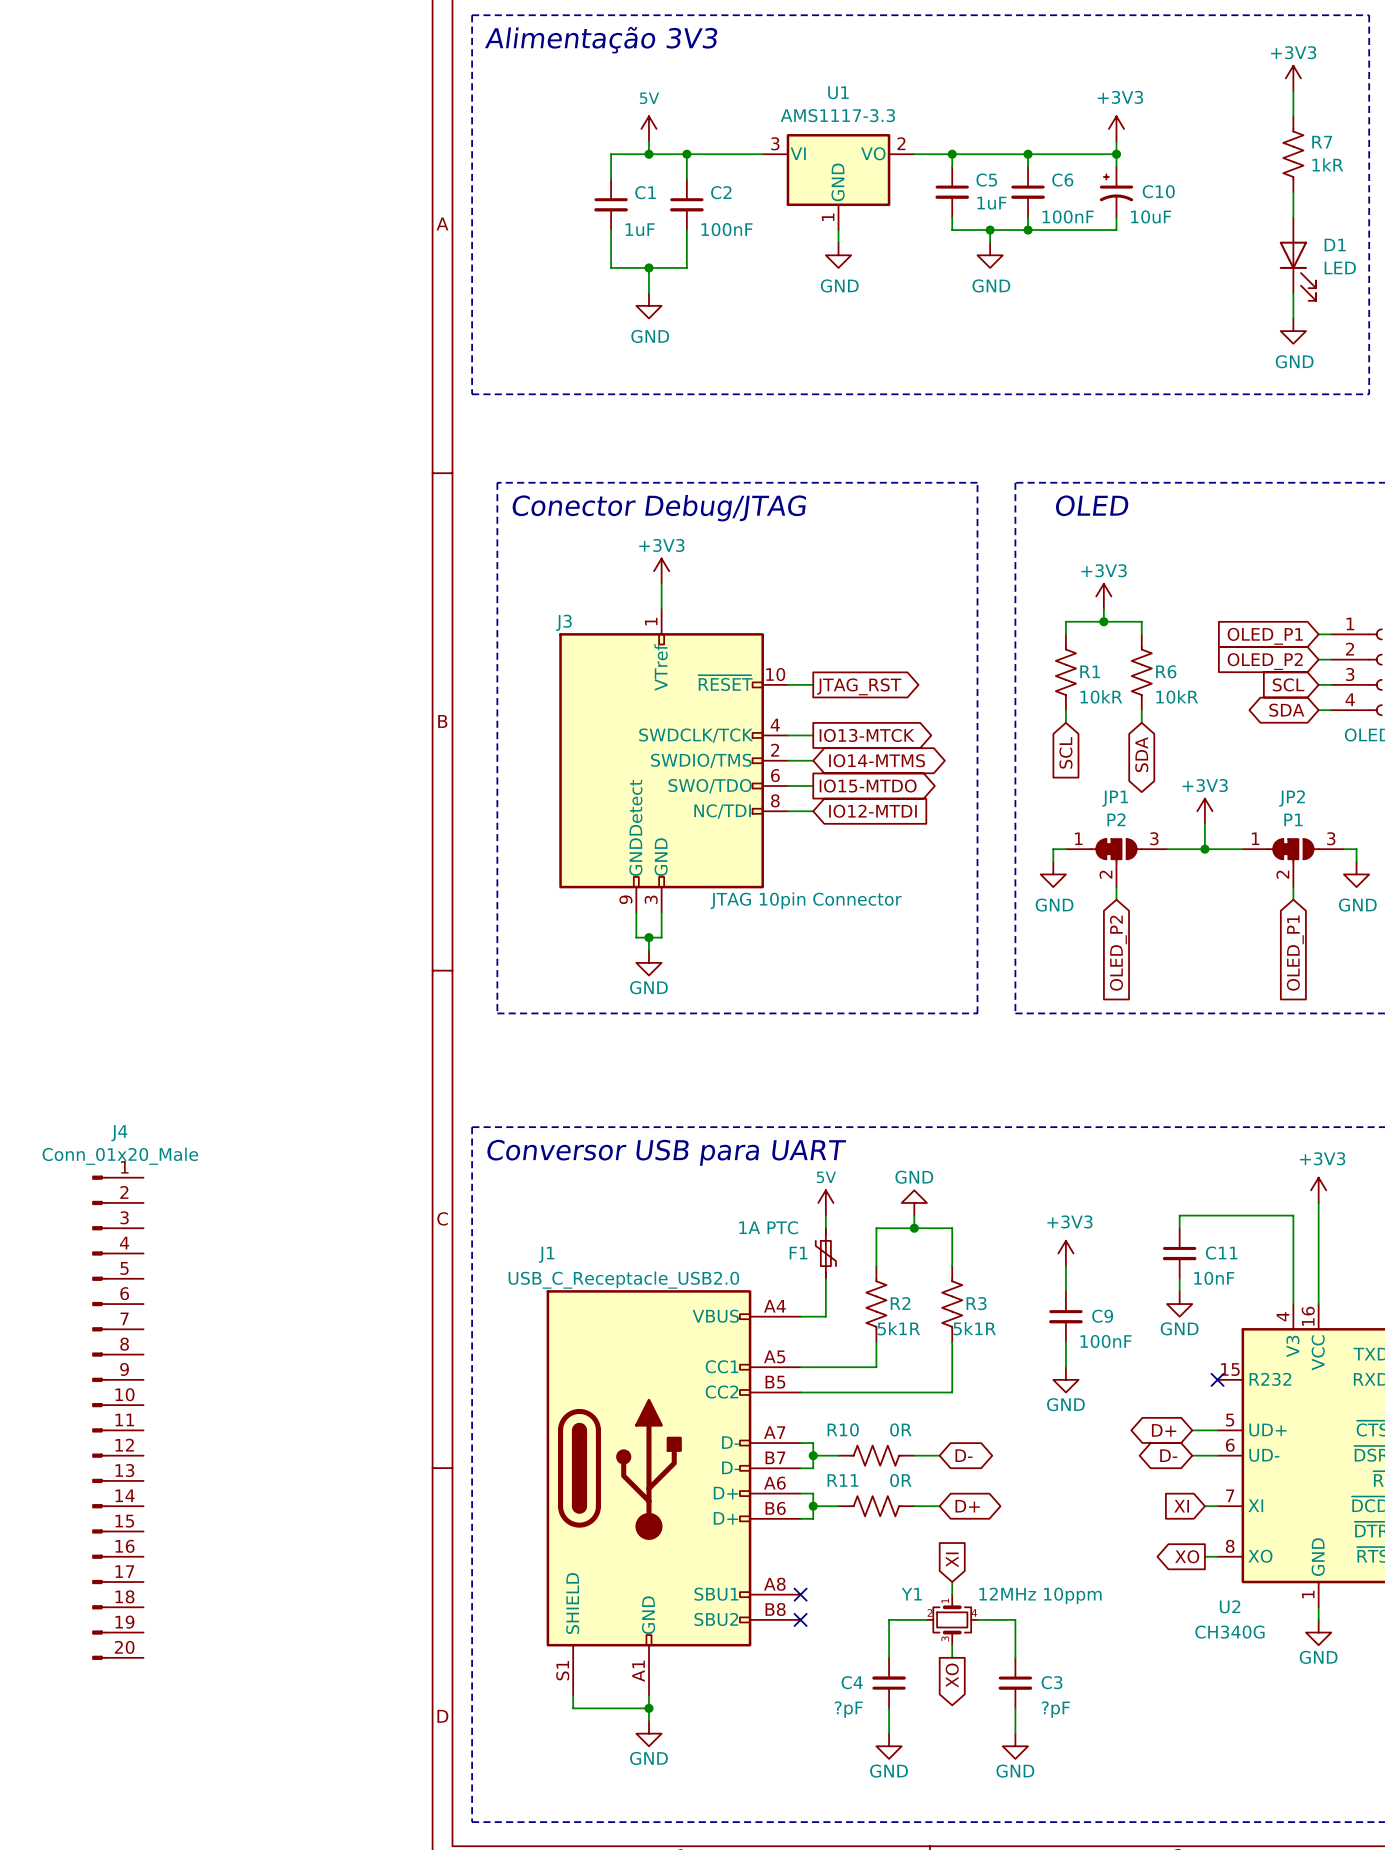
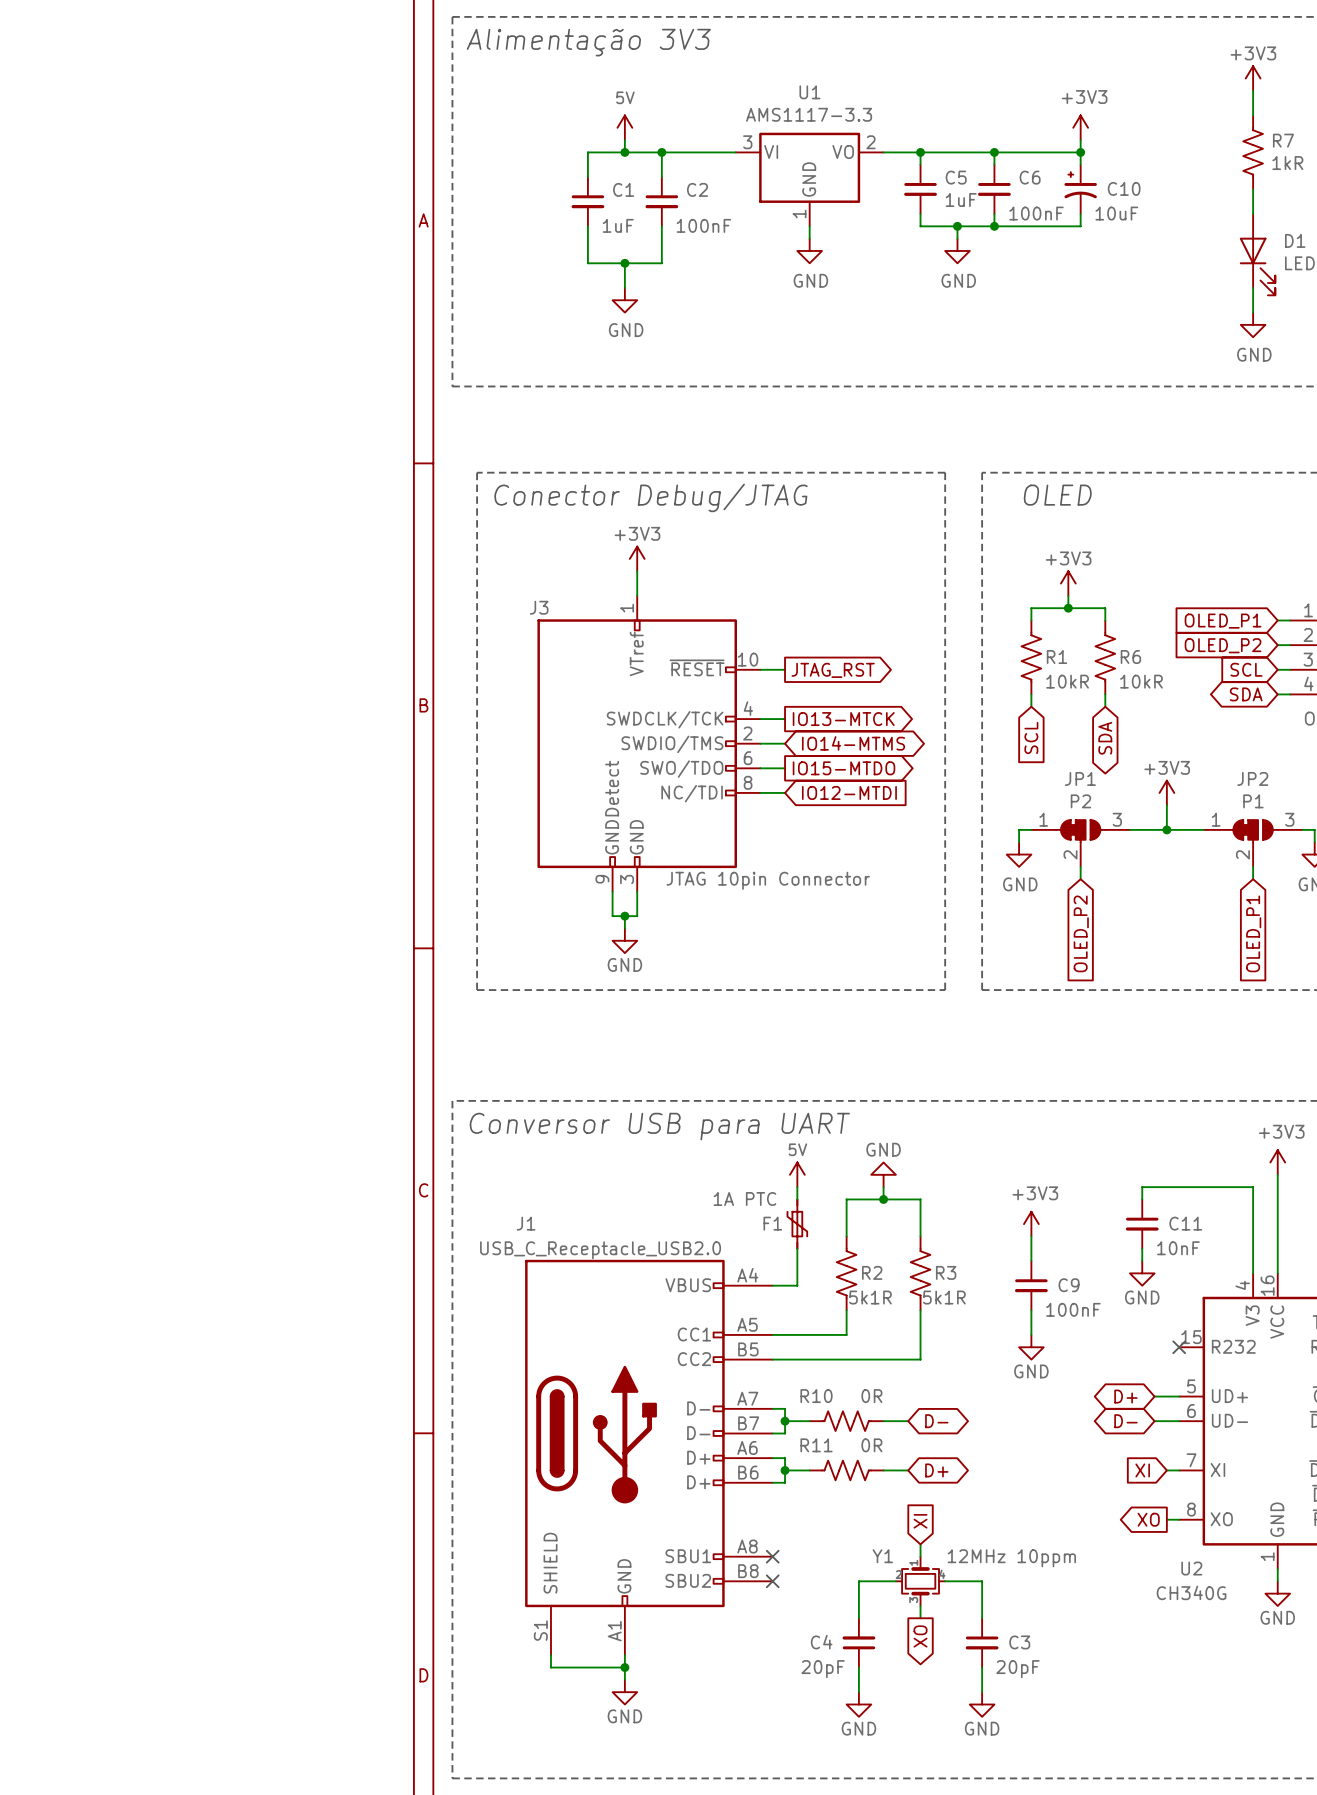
J4: Conn_01x20_Male (117, 1417) -> none
C4 value: ?pF (848, 1709) -> 20pF (823, 1669)
C3 value: ?pF (1055, 1709) -> 20pF (1017, 1669)

